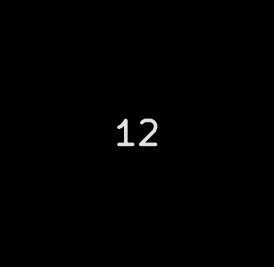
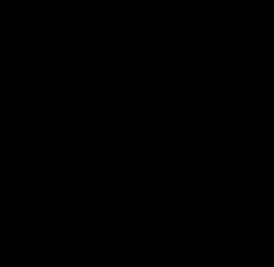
drawing: [117, 118, 158, 147] -> none

